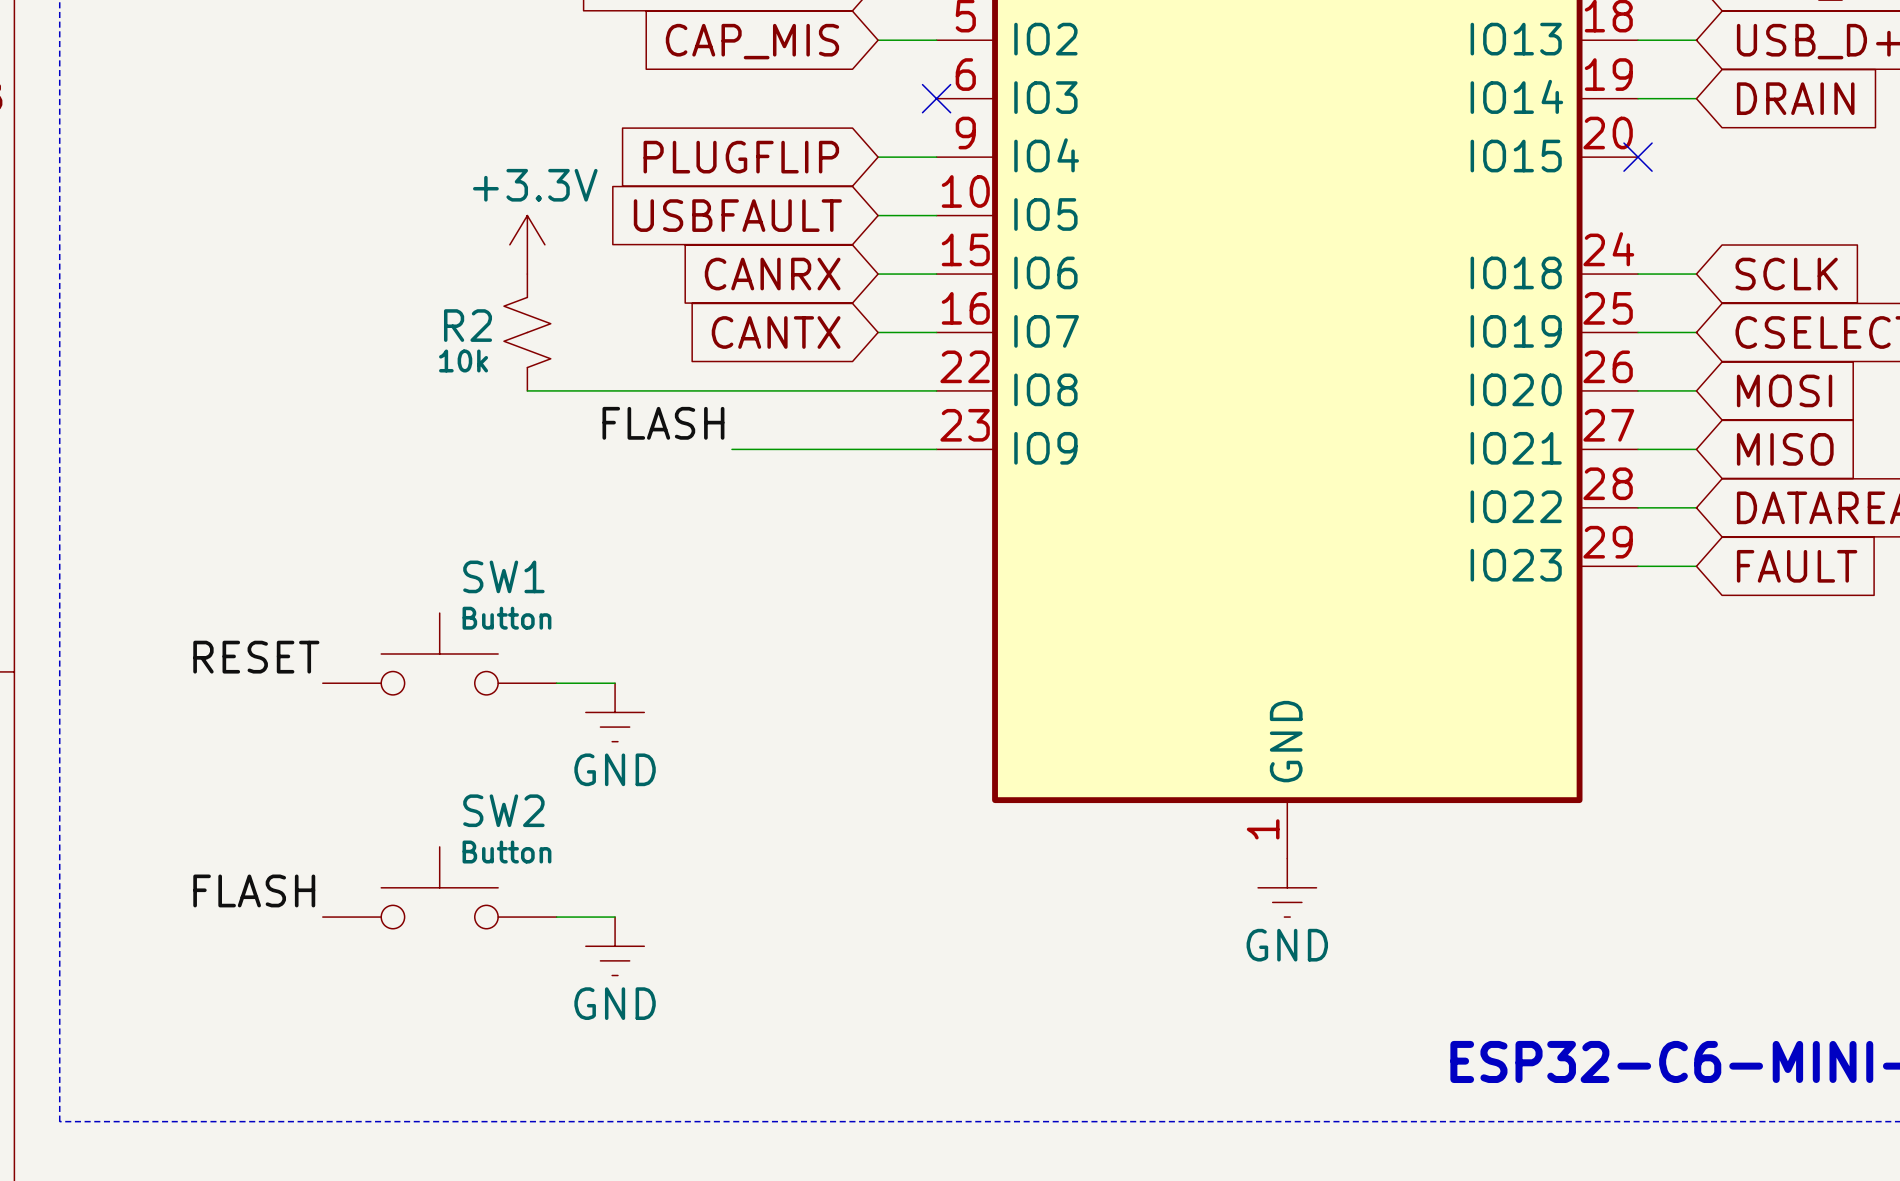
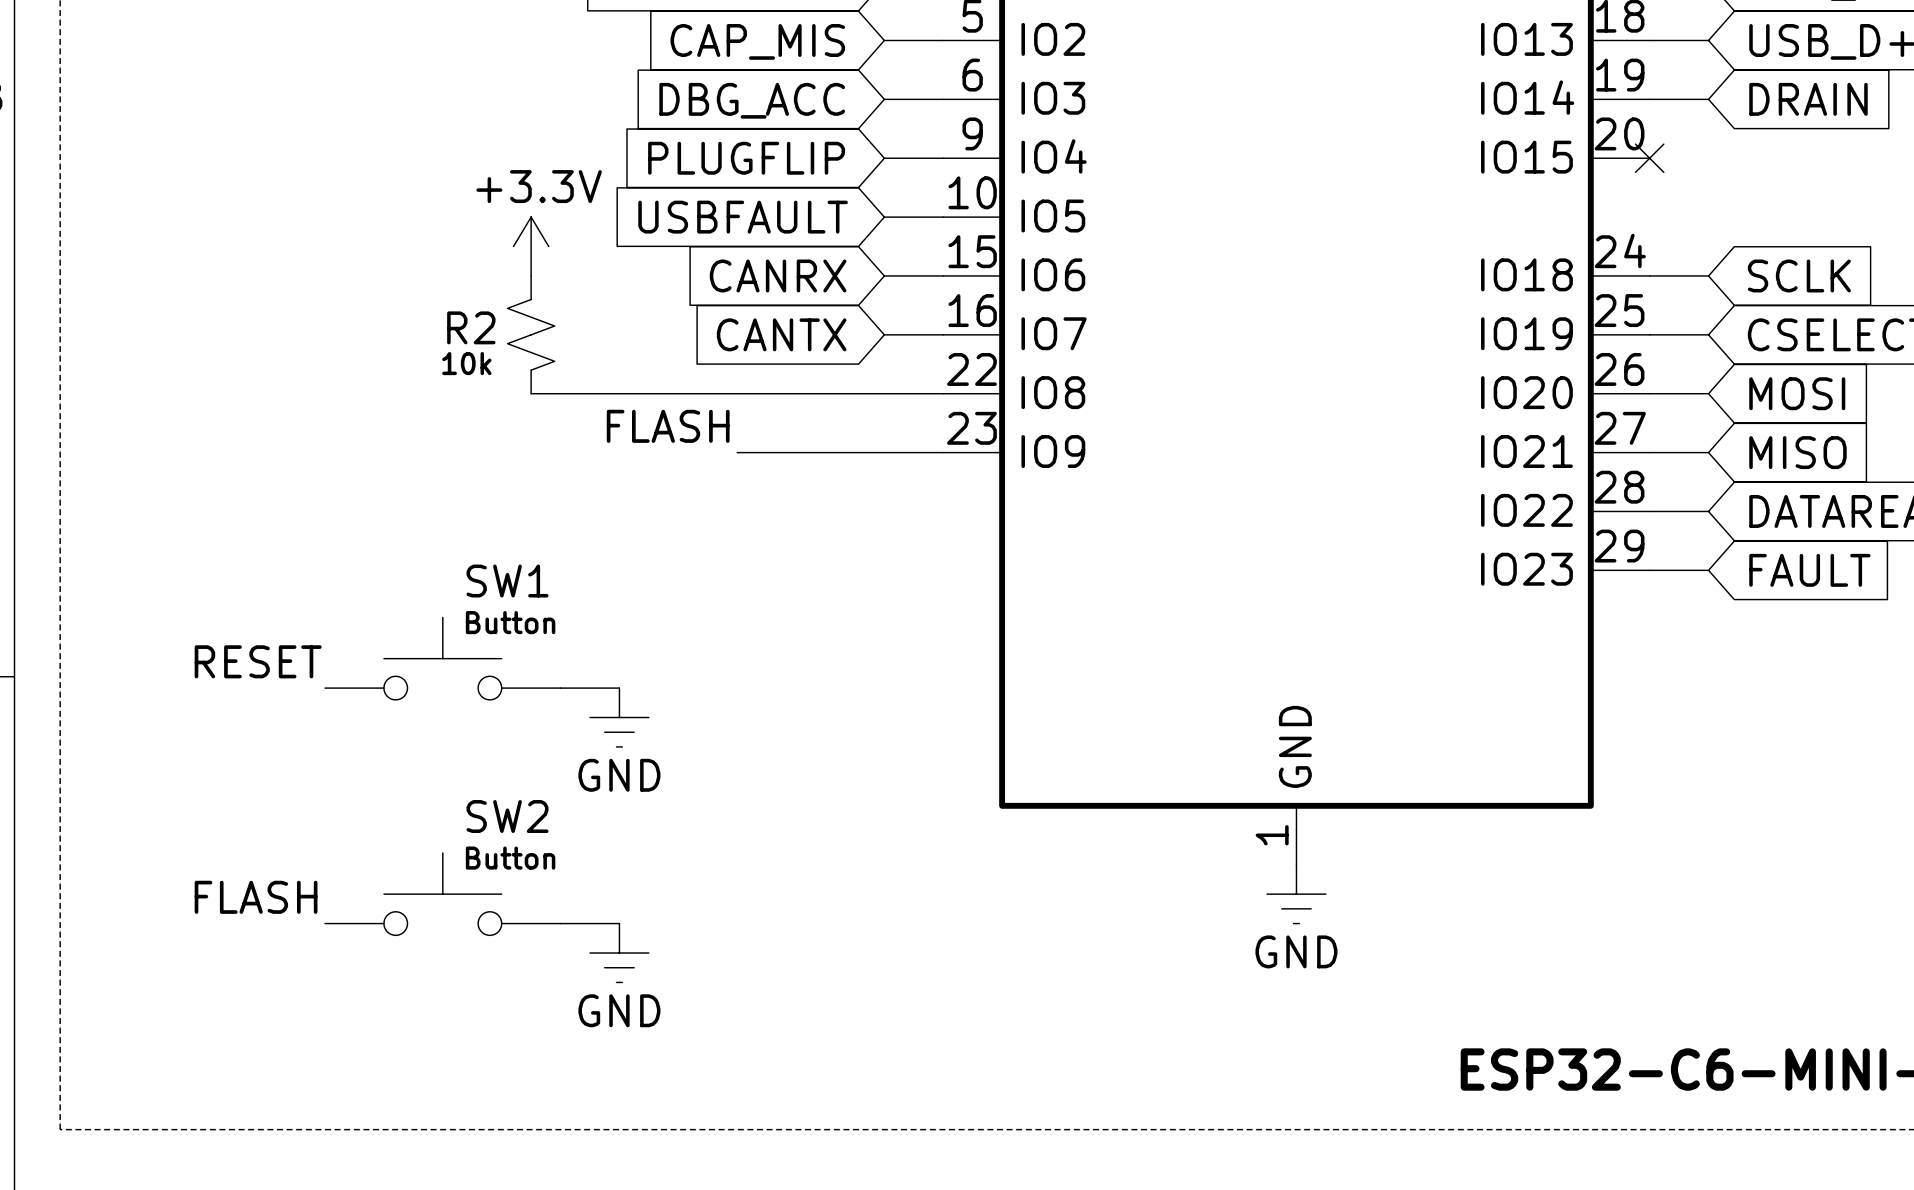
wire: none -> (884, 99) (943, 99)
no-connect mark: (936, 98) -> none
global label: none -> DBG_ACC (752, 100)

